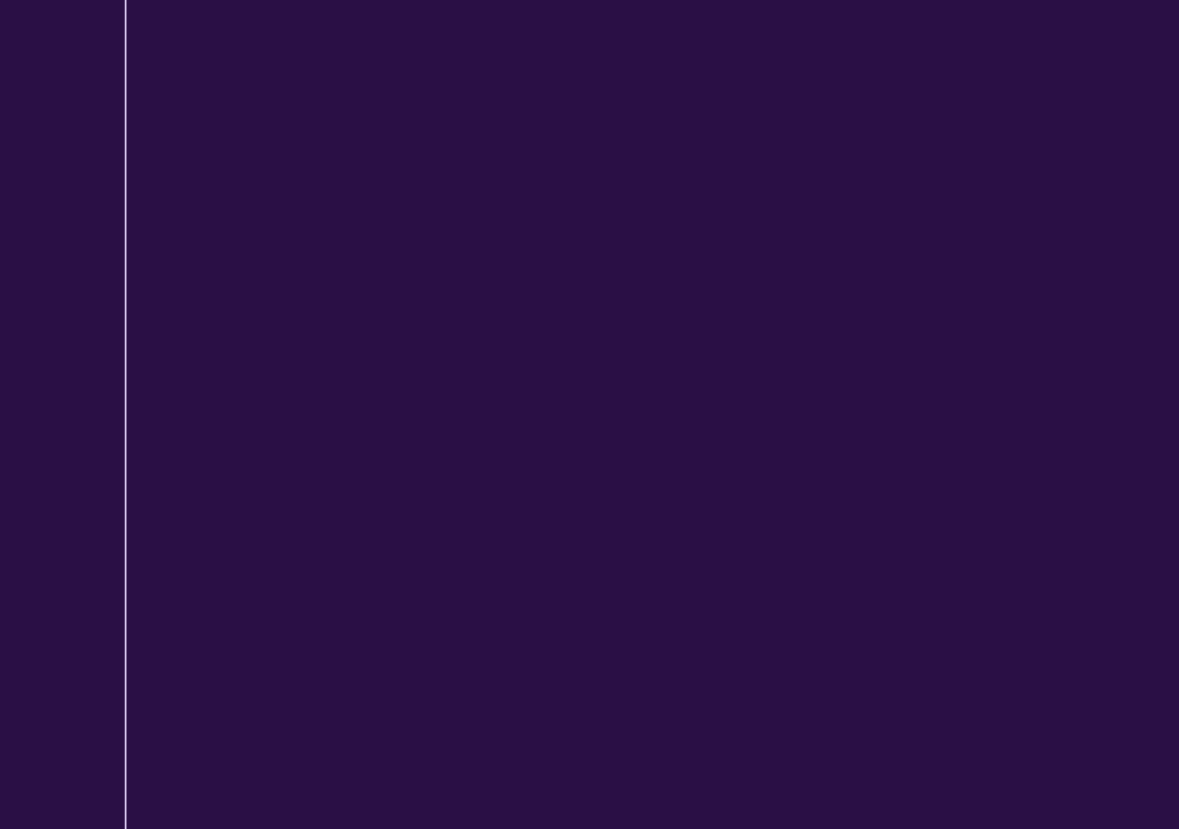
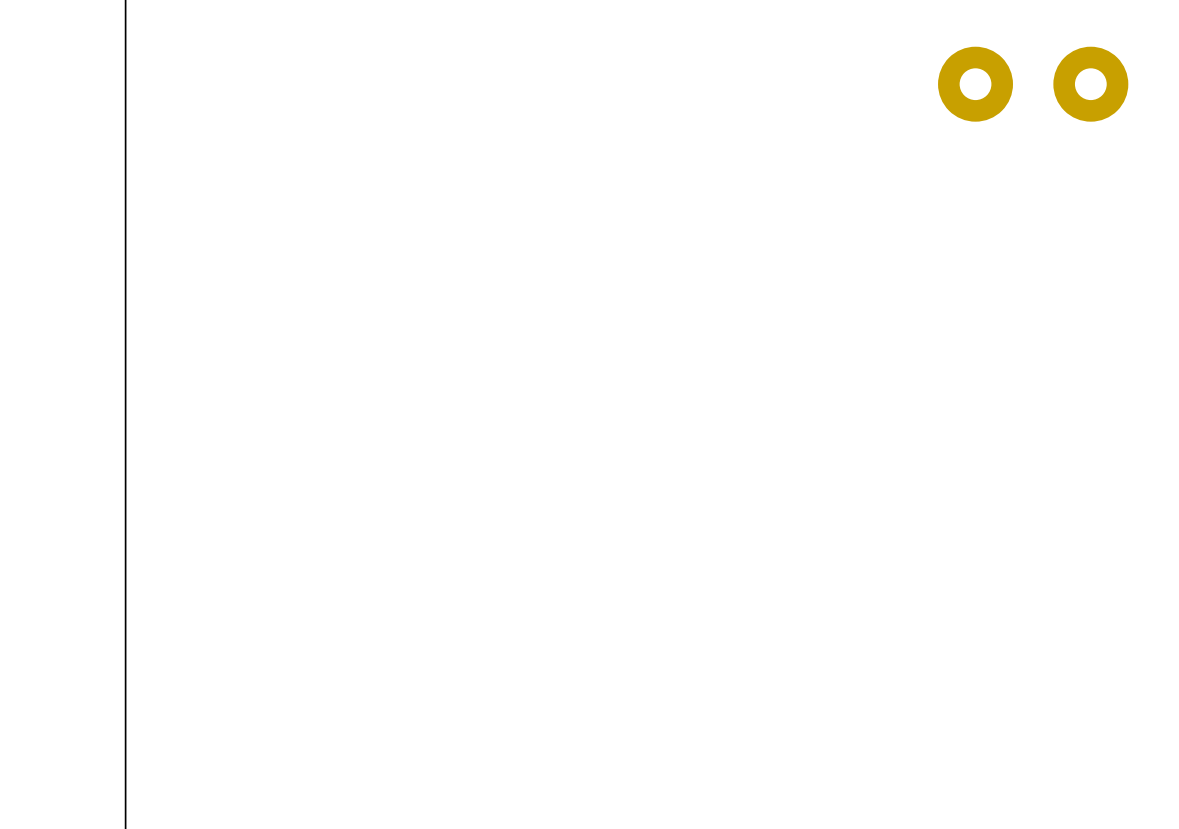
part: none -> (1033, 84)

